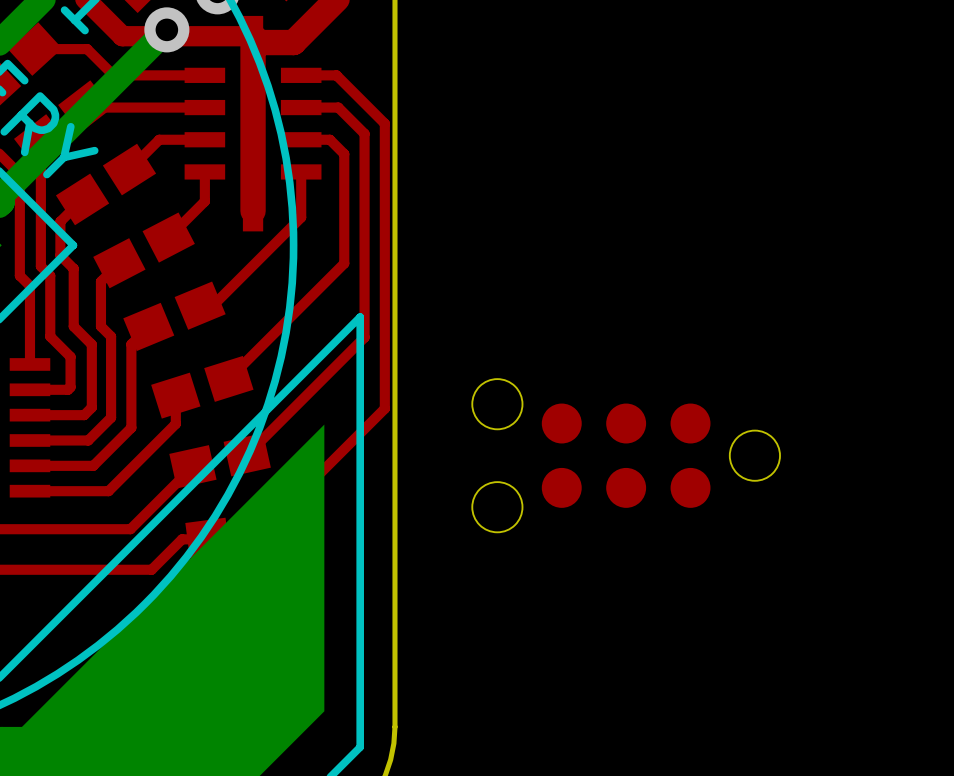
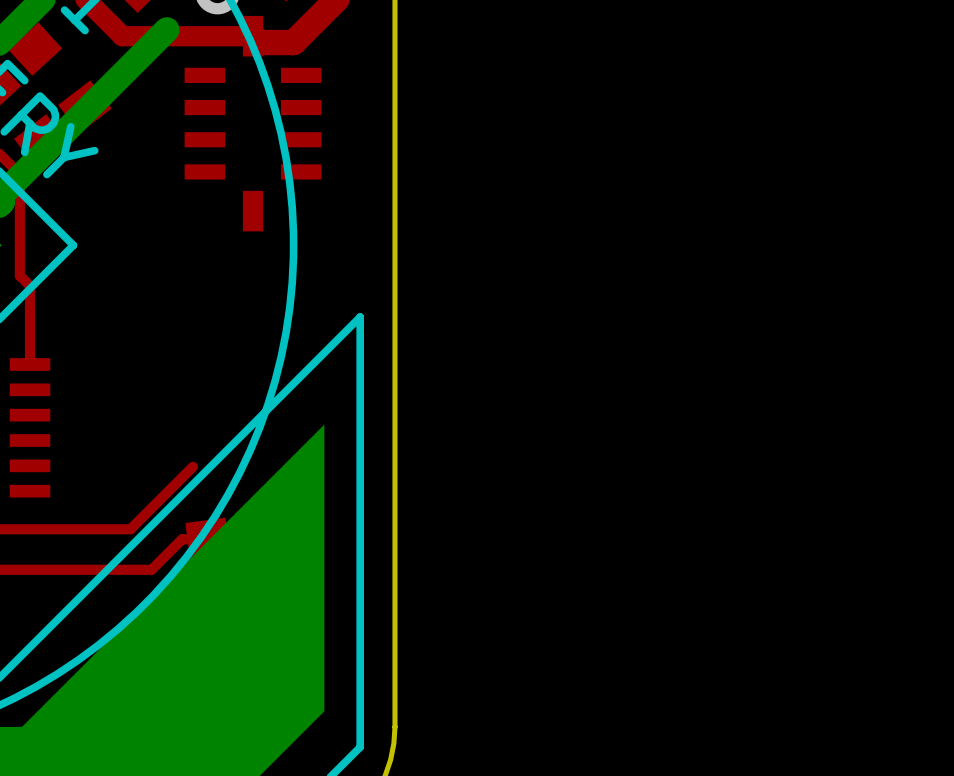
via: (166, 29) -> none
top track: (253, 36) (253, 211) -> none
top track: (35, 49) (87, 49) (113, 75) (204, 75) -> none
top track: (301, 75) (336, 75) (384, 123) (384, 408) (262, 530) -> none
top track: (85, 106) (204, 107) -> none
top track: (301, 107) (338, 107) (364, 133) (364, 337) (247, 454) -> none
top track: (204, 139) (159, 139) (129, 169) -> none
top track: (301, 139) (329, 139) (344, 154) (344, 263) (228, 378) -> none
top track: (40, 140) (40, 266) (50, 275) (50, 336) (70, 356) (70, 387) (68, 389) (29, 389) -> none
top track: (204, 171) (204, 201) (168, 237) -> none
top track: (301, 171) (301, 217) (212, 305) (200, 305) -> none
part: (106, 184) -> none
top track: (82, 199) (60, 221) (60, 255) (73, 268) (73, 326) (91, 344) (91, 407) (84, 415) (50, 415) -> none
part: (144, 250) -> none
top track: (119, 263) (100, 281) (100, 326) (111, 336) (111, 417) (88, 440) (50, 440) -> none
part: (174, 316) -> none
top track: (148, 326) (131, 344) (131, 427) (93, 465) (50, 465) -> none
part: (202, 387) -> none
top track: (175, 395) (175, 423) (108, 491) (50, 491) -> none
part: (626, 455) -> none
part: (220, 460) -> none

